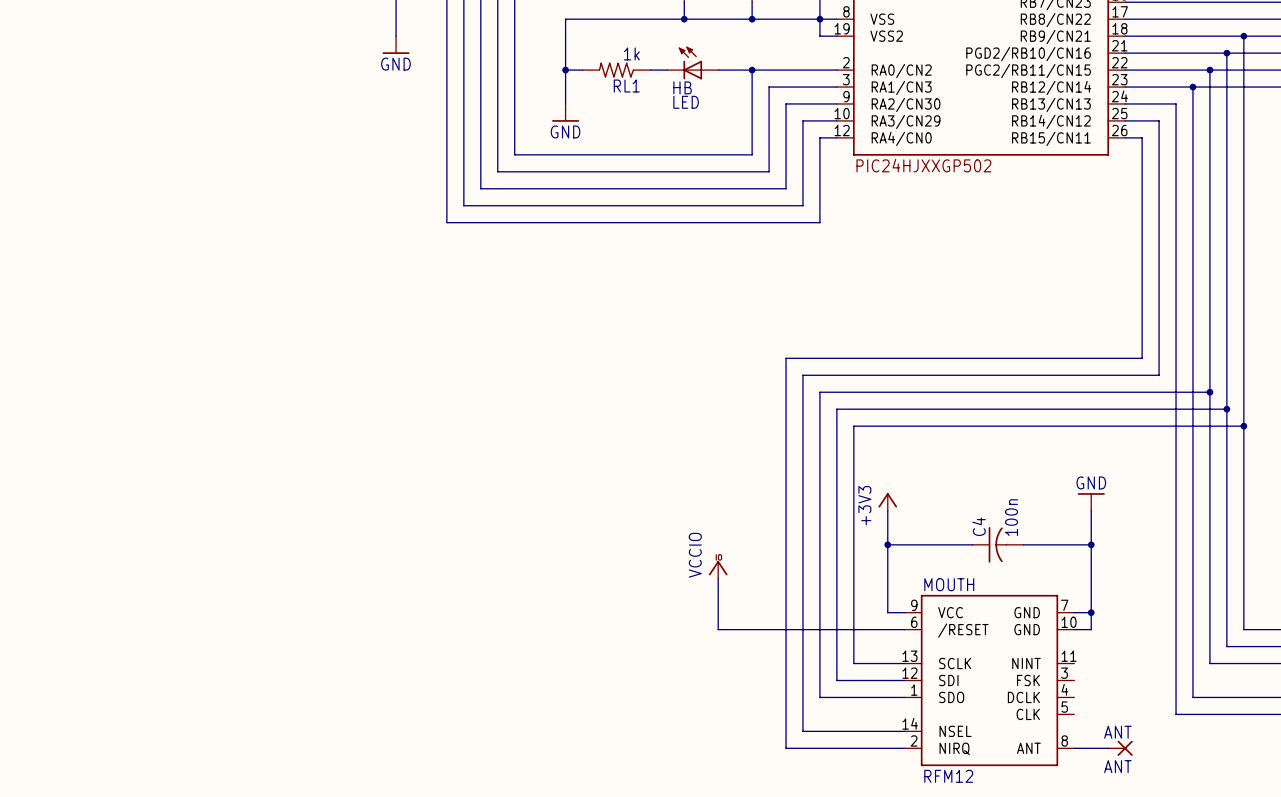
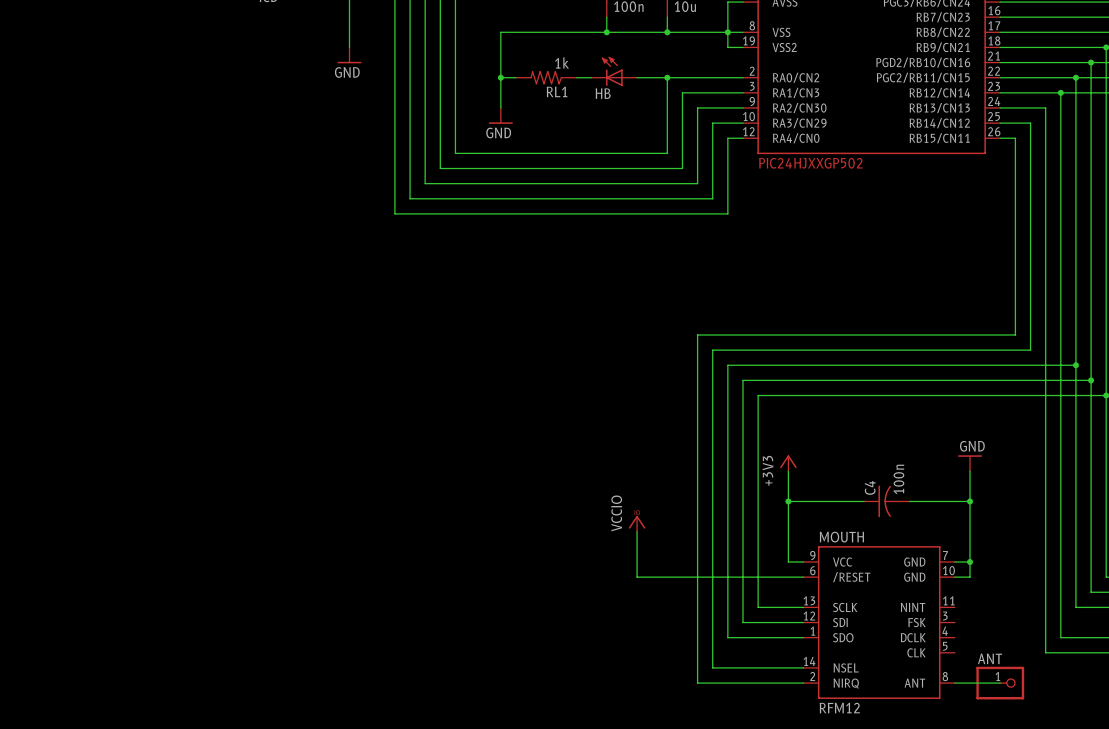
HB value: LED (686, 102) -> none
ANT value: ANT (1117, 732) -> none
ANT symbol: [1108, 740, 1133, 756] -> [976, 666, 1025, 700]
ANT name position: ANT (1117, 766) -> ANT (990, 658)

